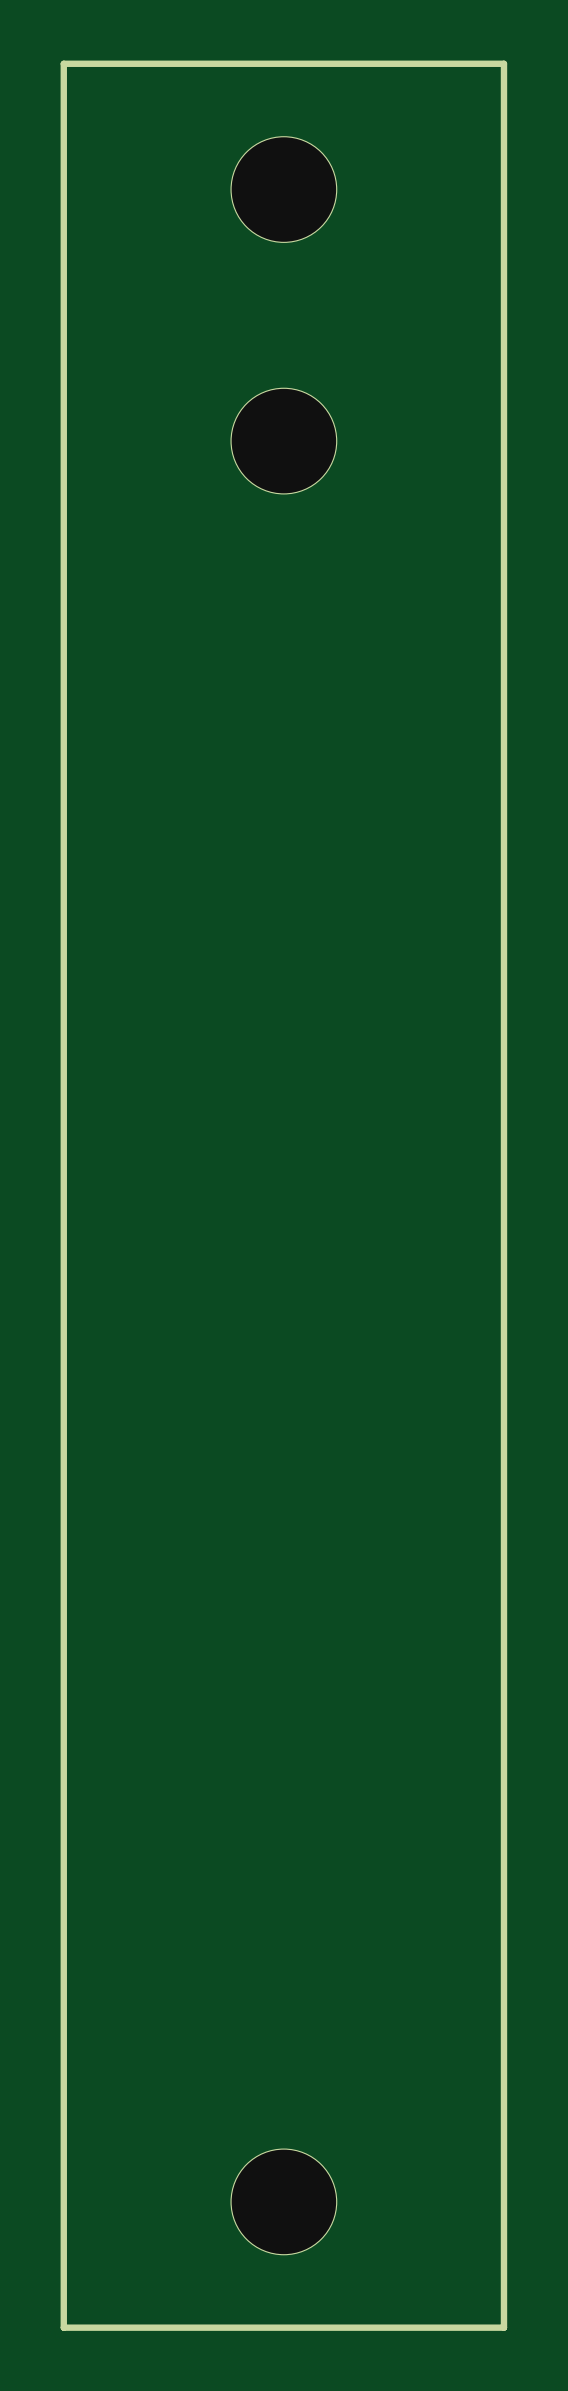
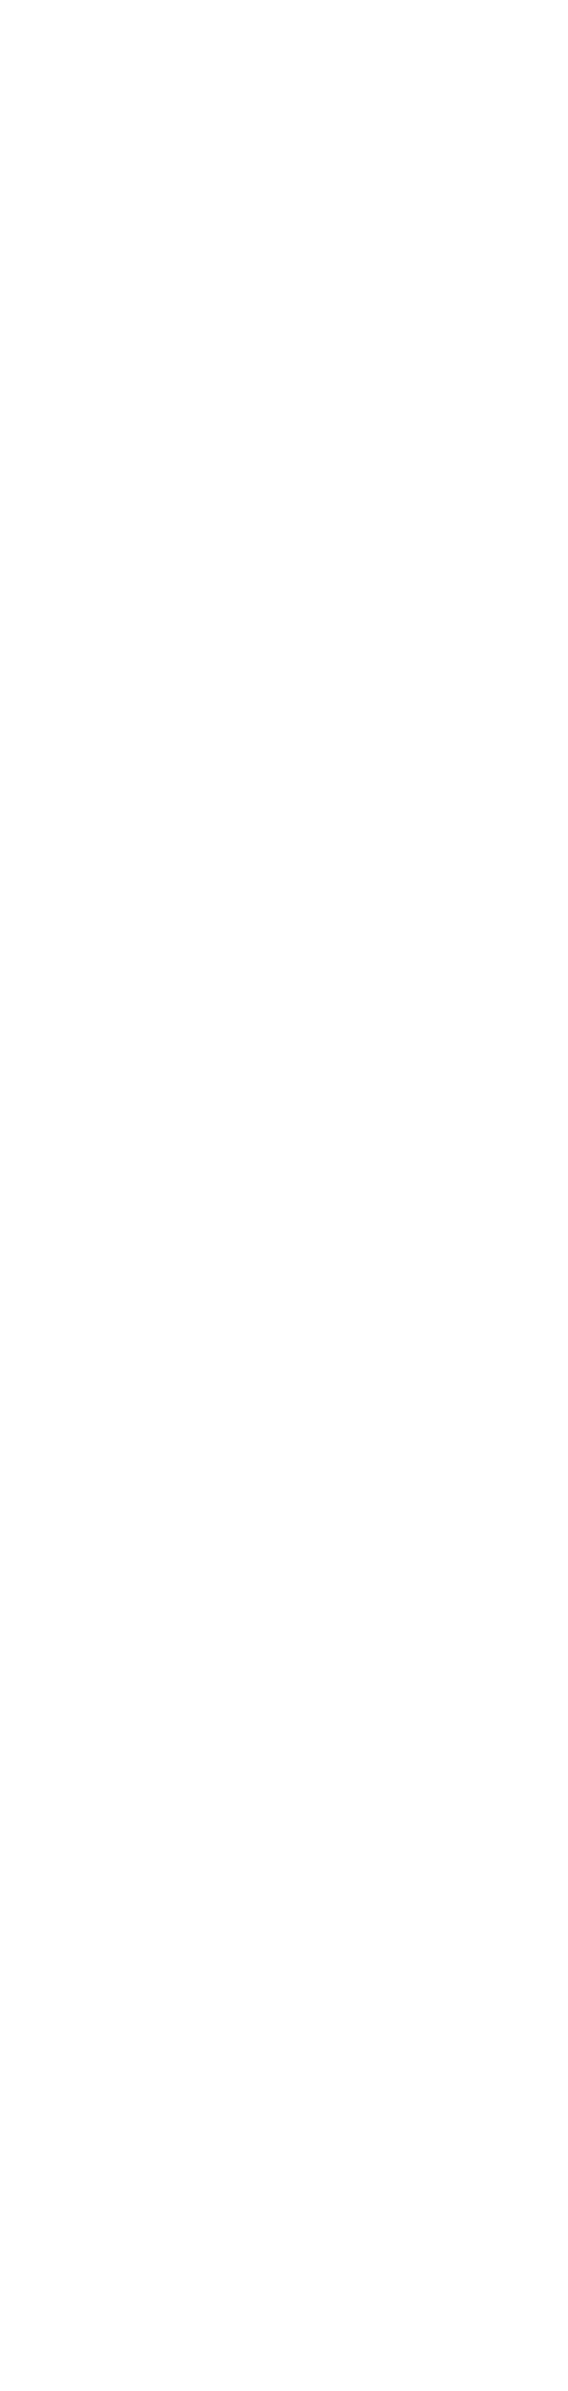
board edge: (503, 63) (503, 2327) (63, 2327) (63, 63) (503, 63) -> none
hole: (283, 189) -> none
hole: (283, 441) -> none
hole: (283, 2201) -> none

